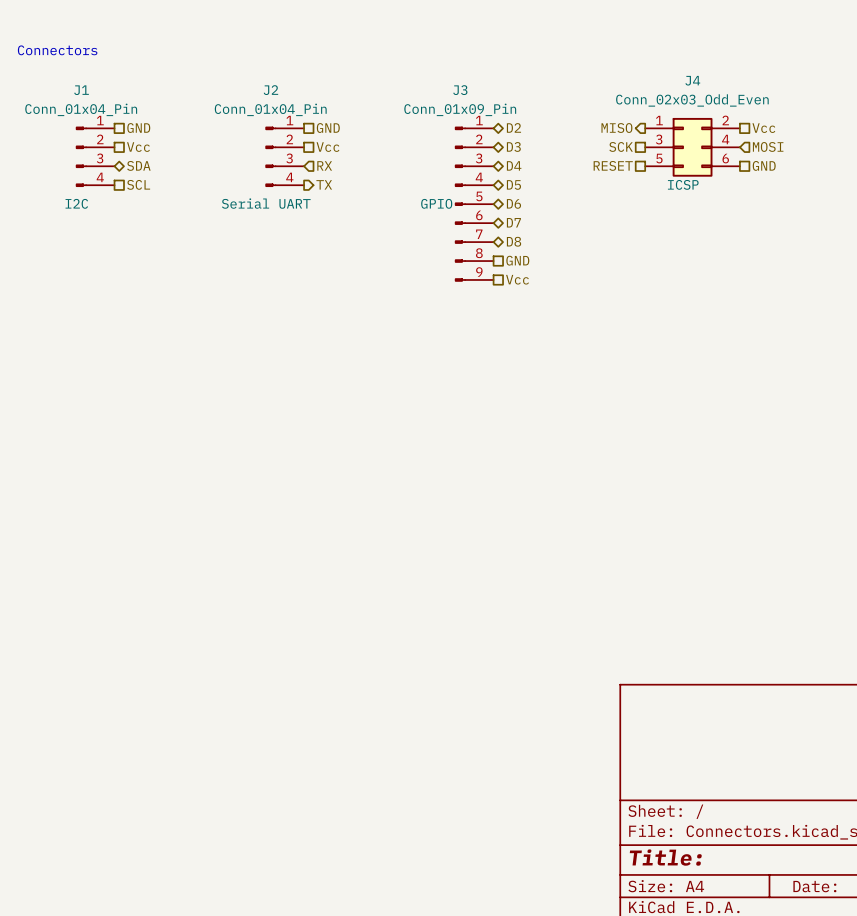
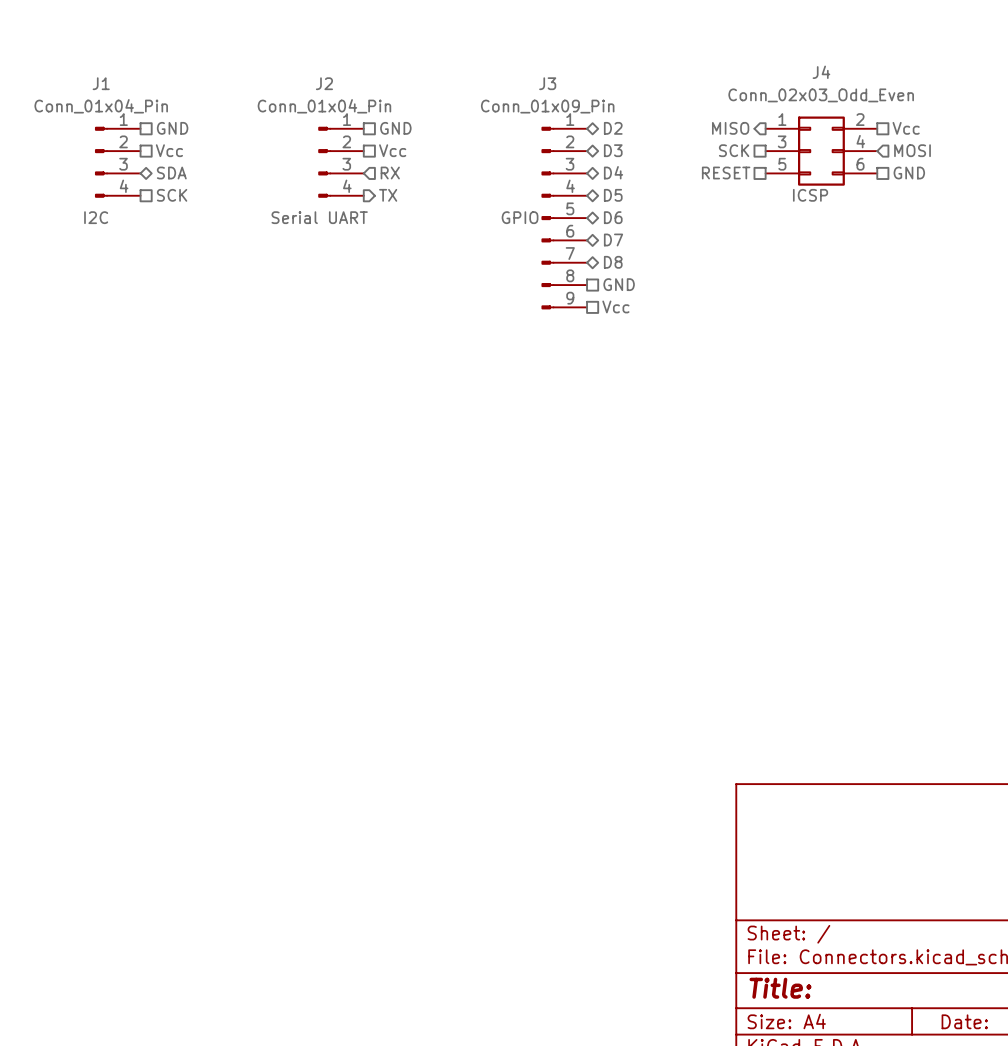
text: Connectors (57, 50) -> none
hierarchical label: SCL (138, 184) -> SCK (172, 195)

